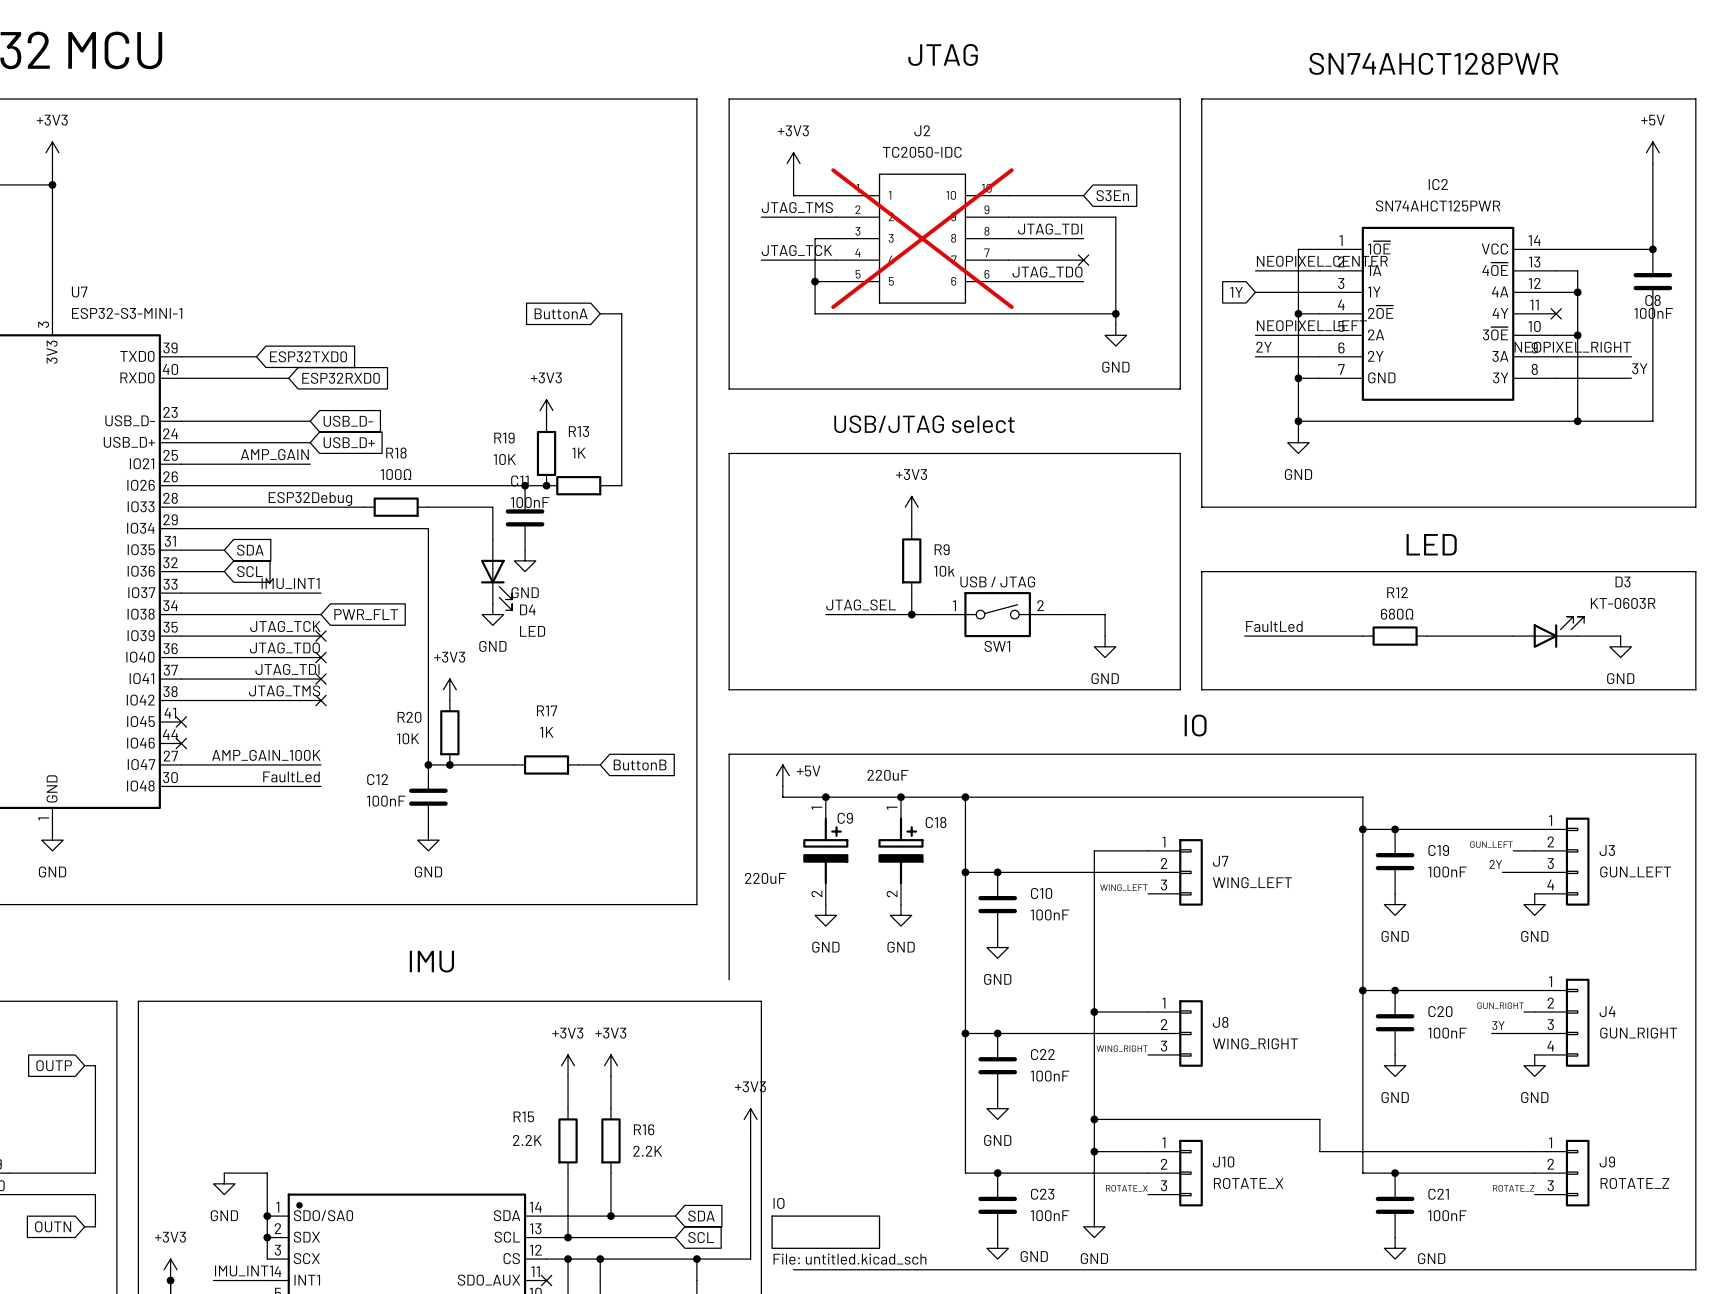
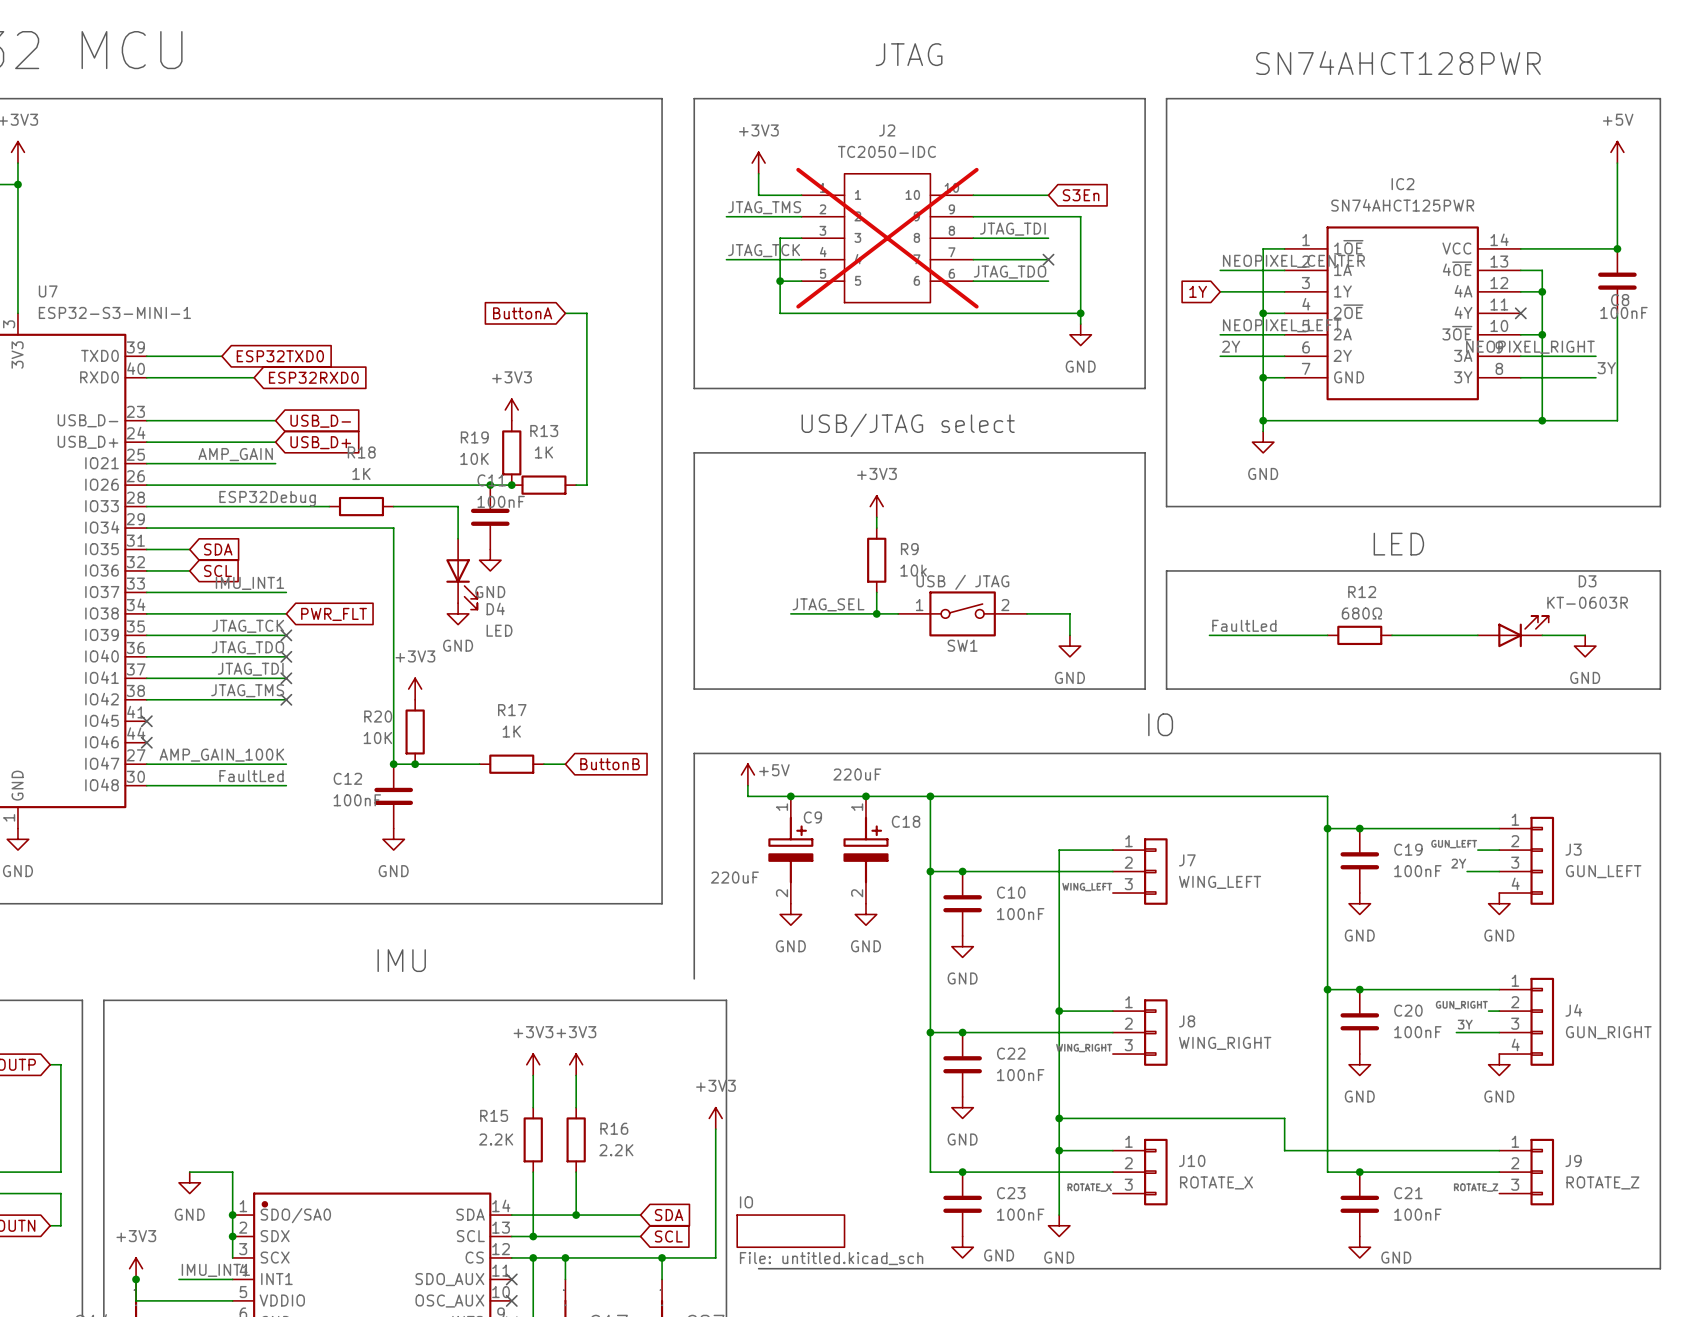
R18 value: 100Ω (396, 474) -> 1K (361, 473)

